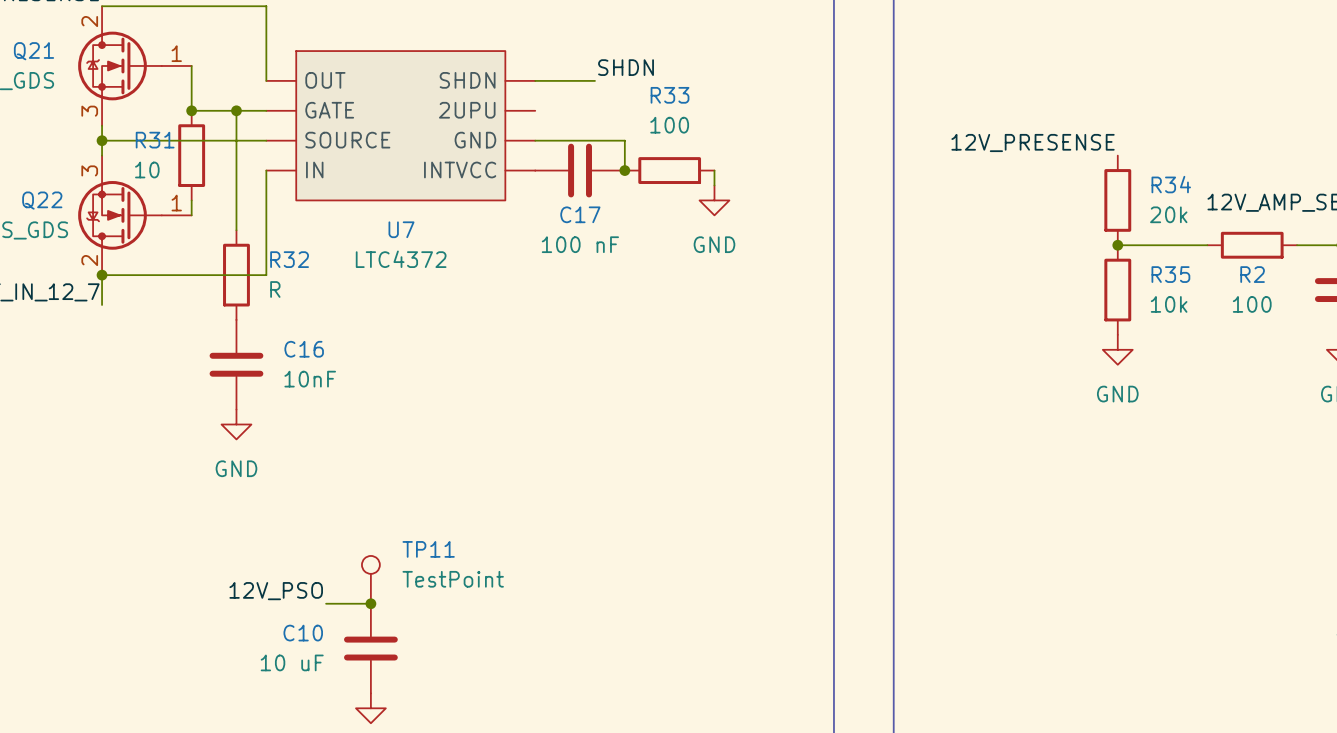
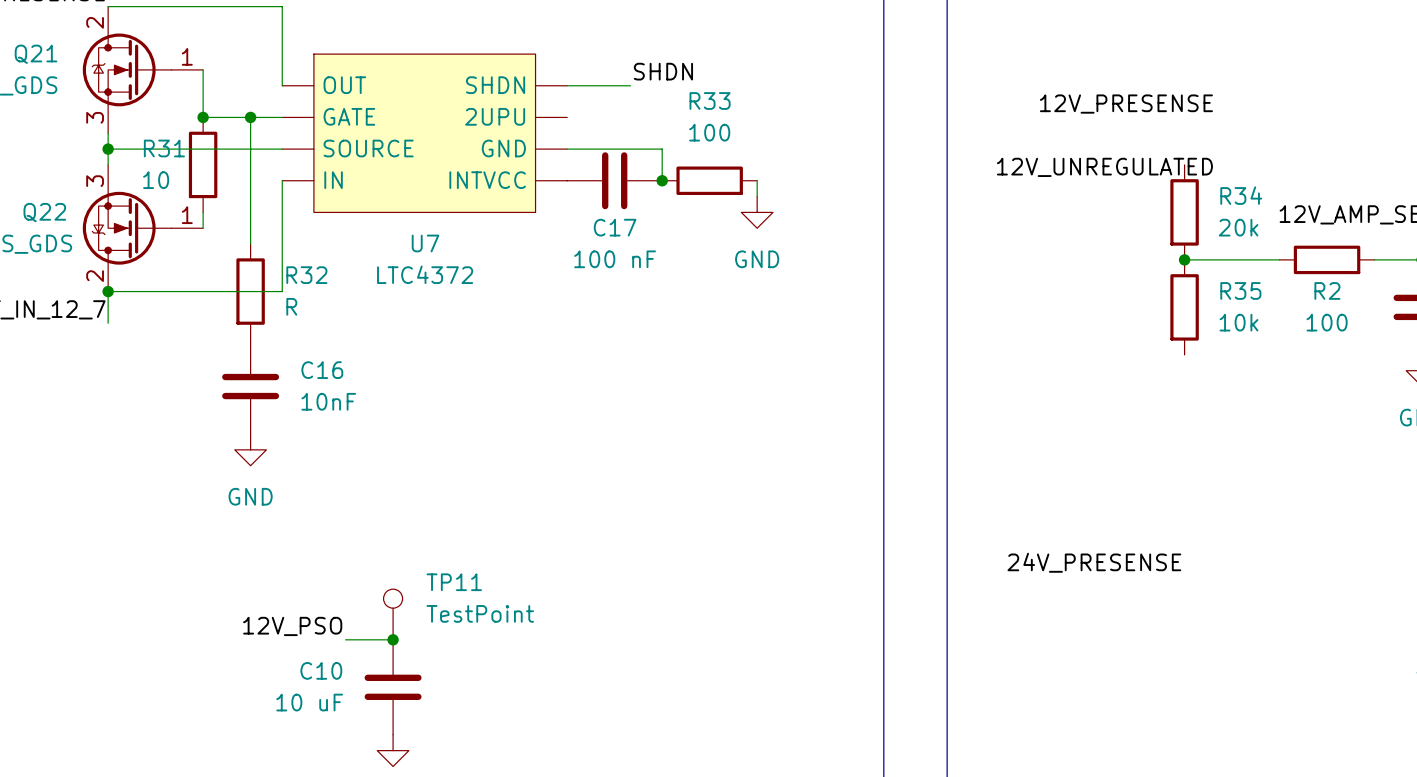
label position: 12V_PRESENSE (1033, 143) -> 12V_PRESENSE (1126, 104)
label: none -> 12V_UNREGULATED (1104, 167)
power symbol: GND (1117, 349) -> none
label: none -> 24V_PRESENSE (1094, 562)

